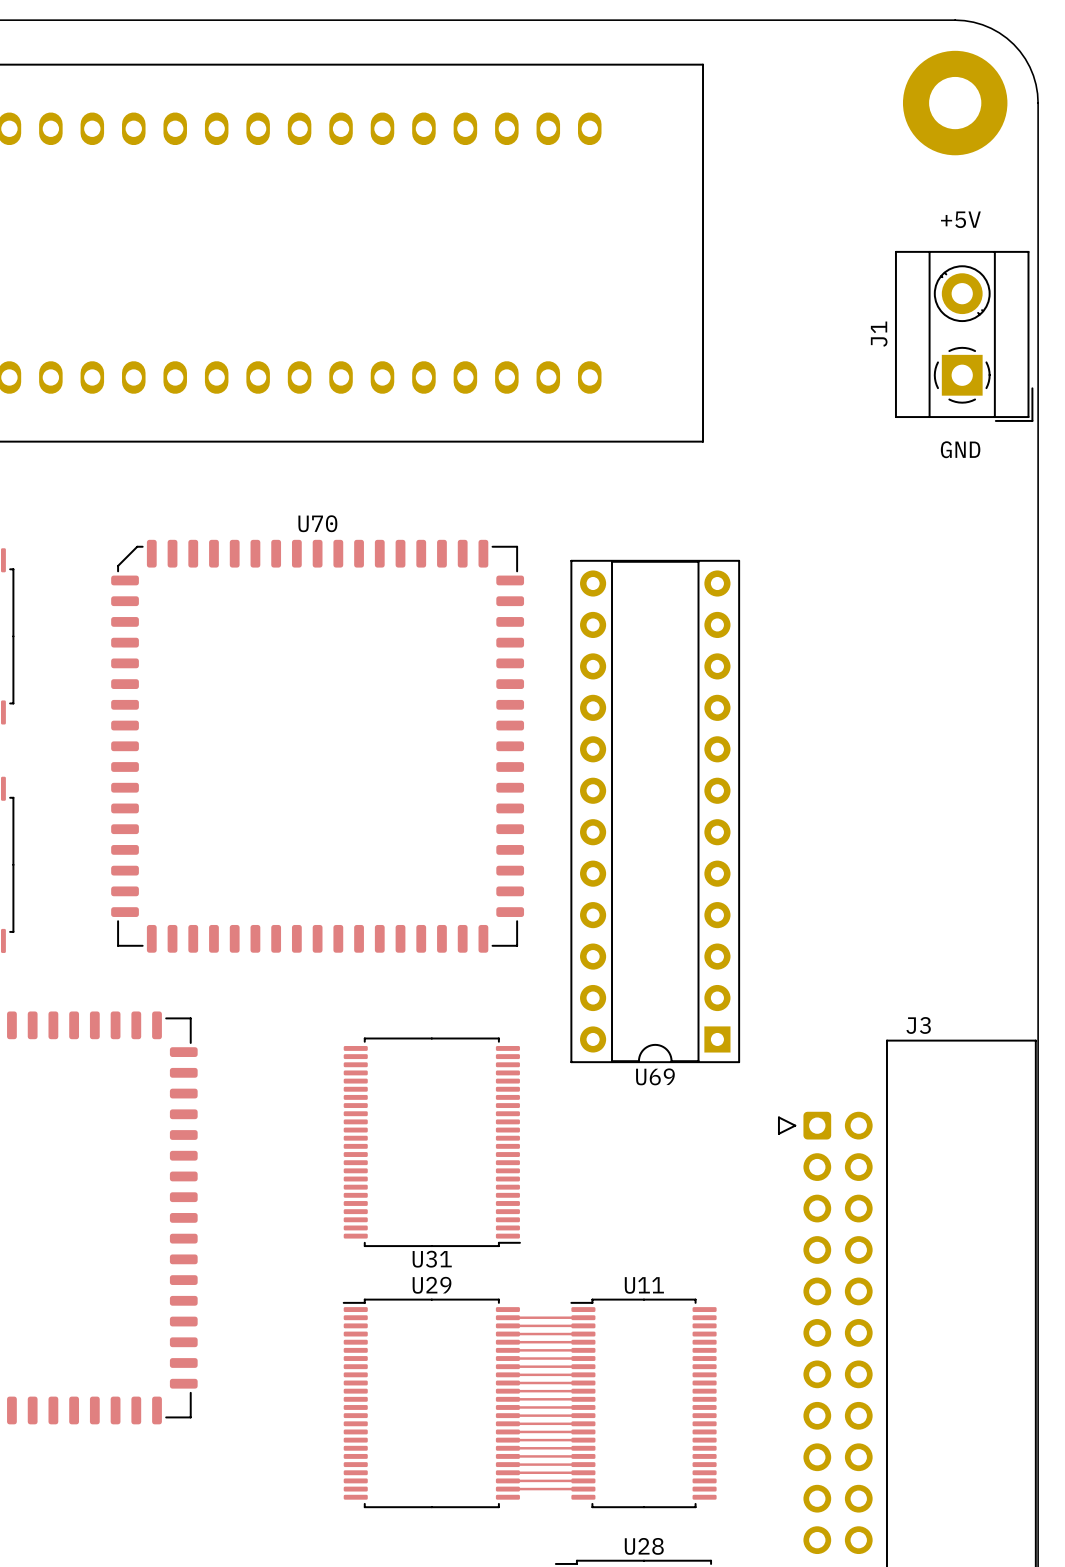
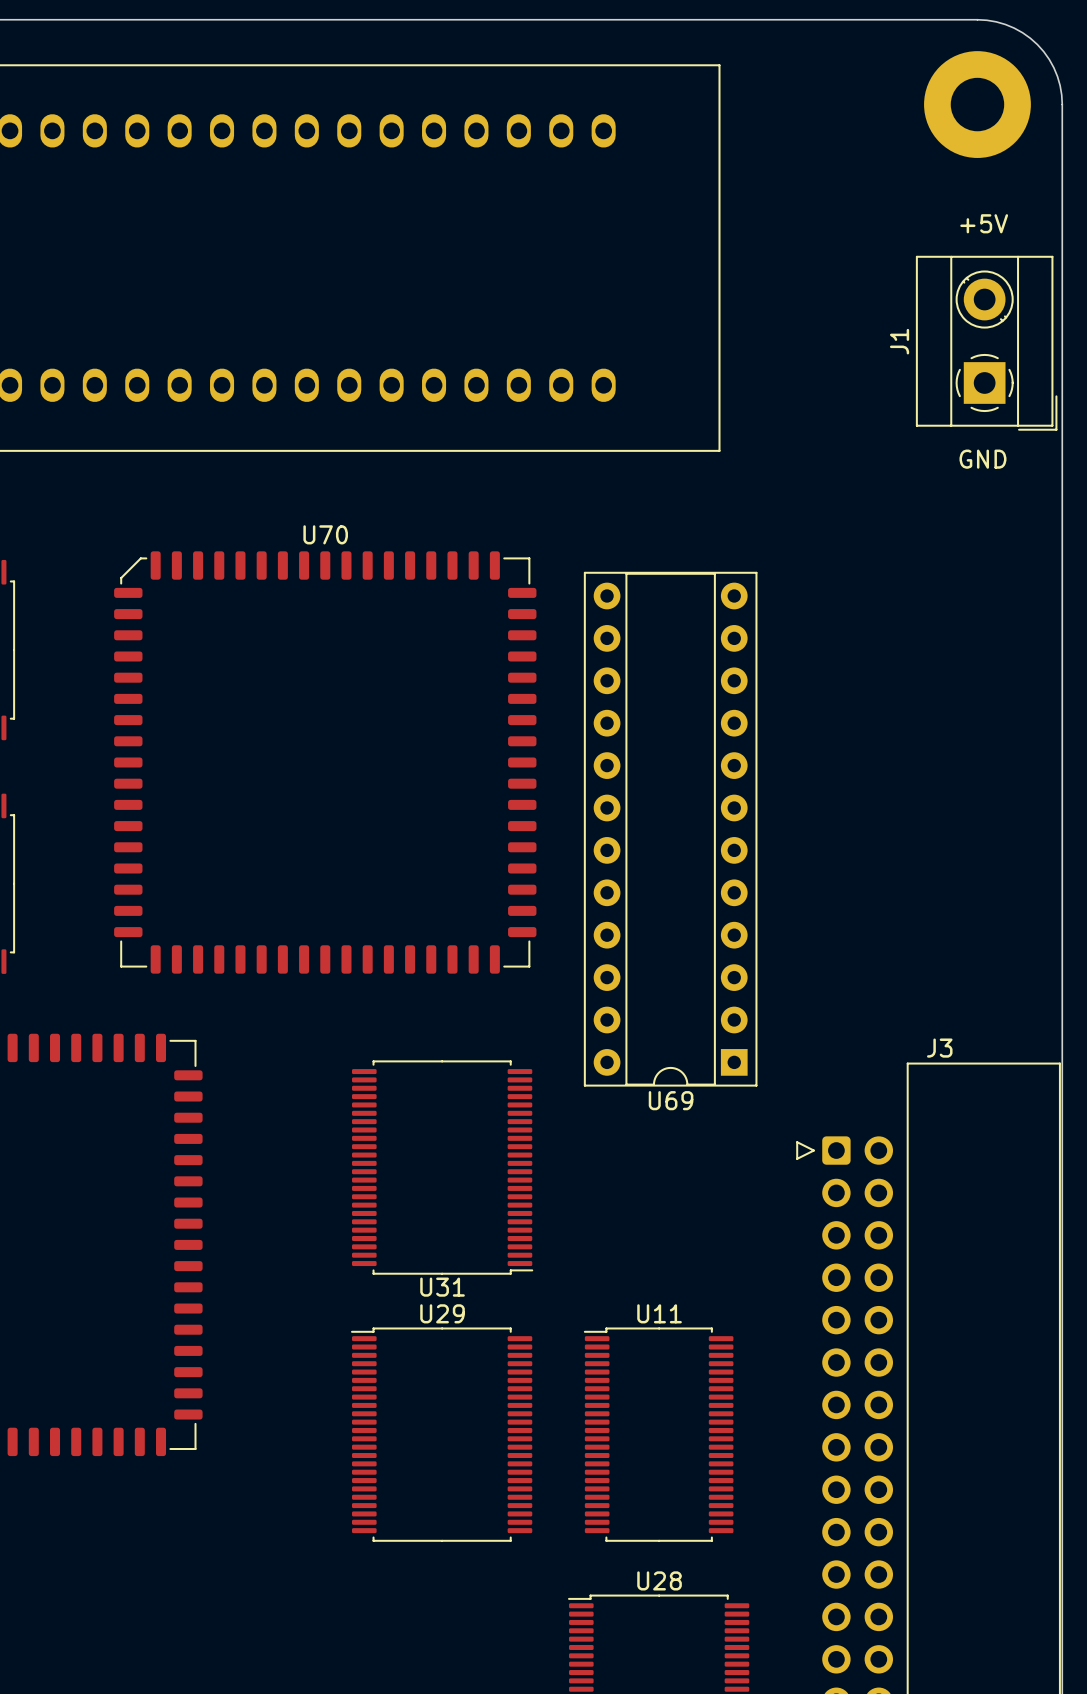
track: (507, 1317) (583, 1317) -> none
track: (507, 1325) (583, 1325) -> none
track: (507, 1334) (583, 1334) -> none
track: (507, 1342) (583, 1342) -> none
track: (507, 1350) (583, 1350) -> none
track: (507, 1358) (583, 1358) -> none
track: (507, 1366) (583, 1366) -> none
track: (507, 1374) (583, 1374) -> none
track: (507, 1383) (583, 1383) -> none
track: (507, 1391) (583, 1391) -> none
track: (507, 1399) (583, 1399) -> none
track: (507, 1407) (583, 1407) -> none
track: (507, 1415) (583, 1415) -> none
track: (507, 1423) (583, 1423) -> none
track: (507, 1431) (583, 1431) -> none
track: (507, 1440) (583, 1440) -> none
track: (507, 1448) (583, 1448) -> none
track: (507, 1456) (583, 1456) -> none
track: (507, 1464) (583, 1464) -> none
track: (507, 1472) (583, 1472) -> none
track: (507, 1480) (583, 1480) -> none
track: (507, 1489) (583, 1489) -> none

